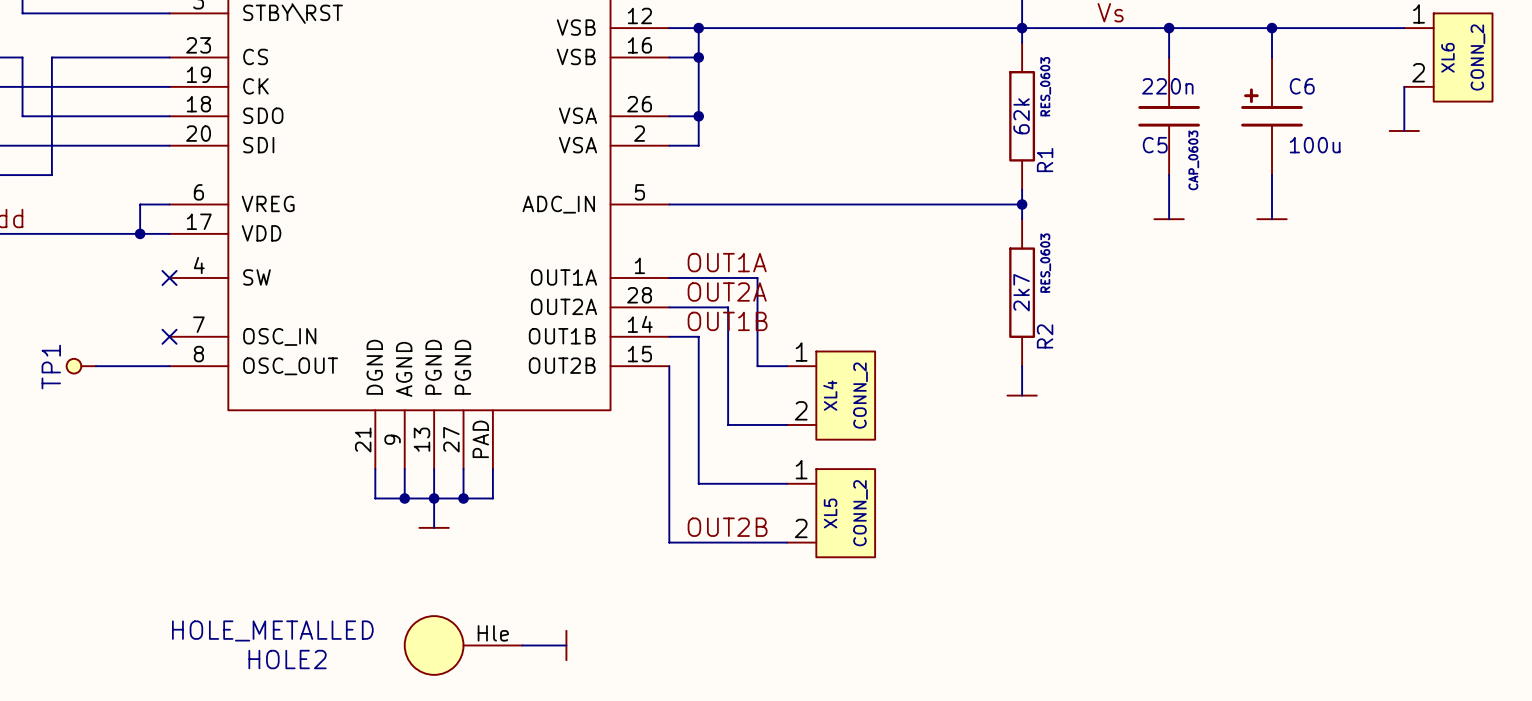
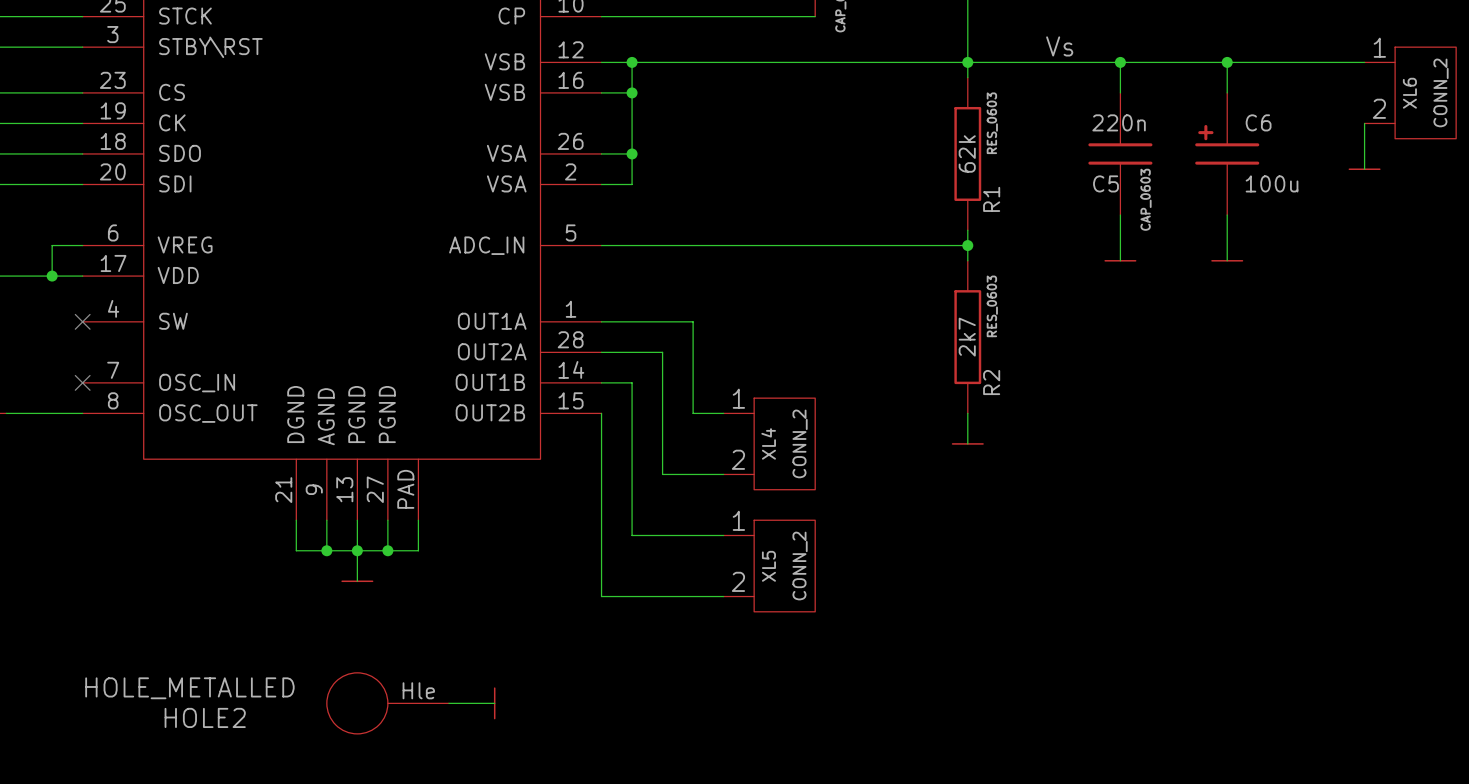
label: OUT1A (727, 262) -> none
label: OUT2A (727, 292) -> none
label: OUT1B (727, 321) -> none
label: OUT2B (727, 527) -> none

